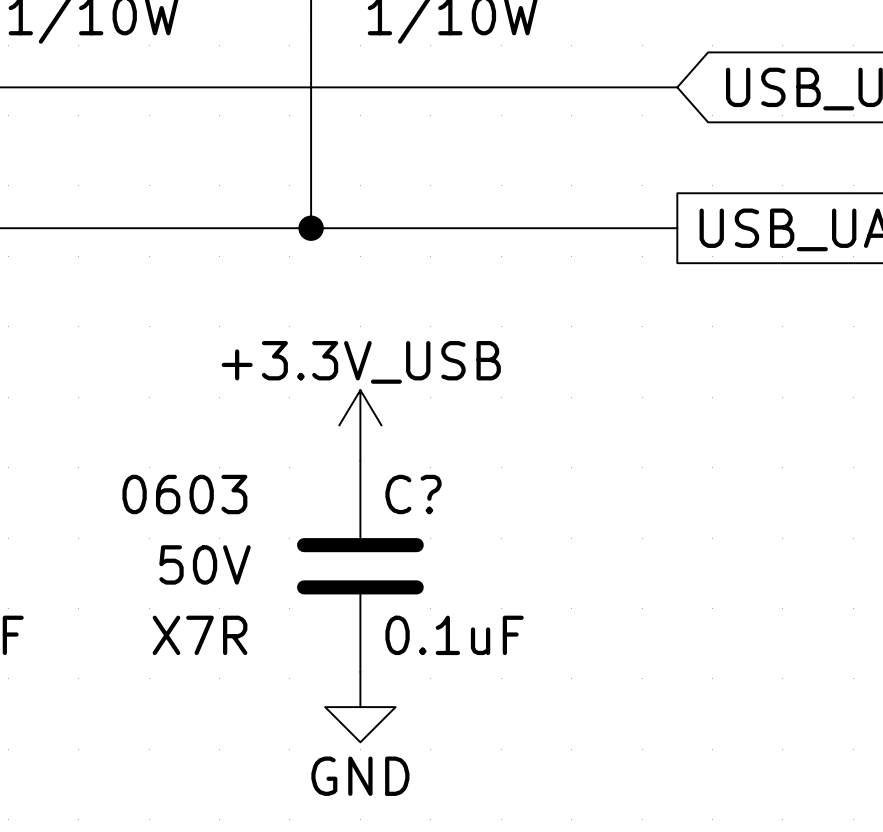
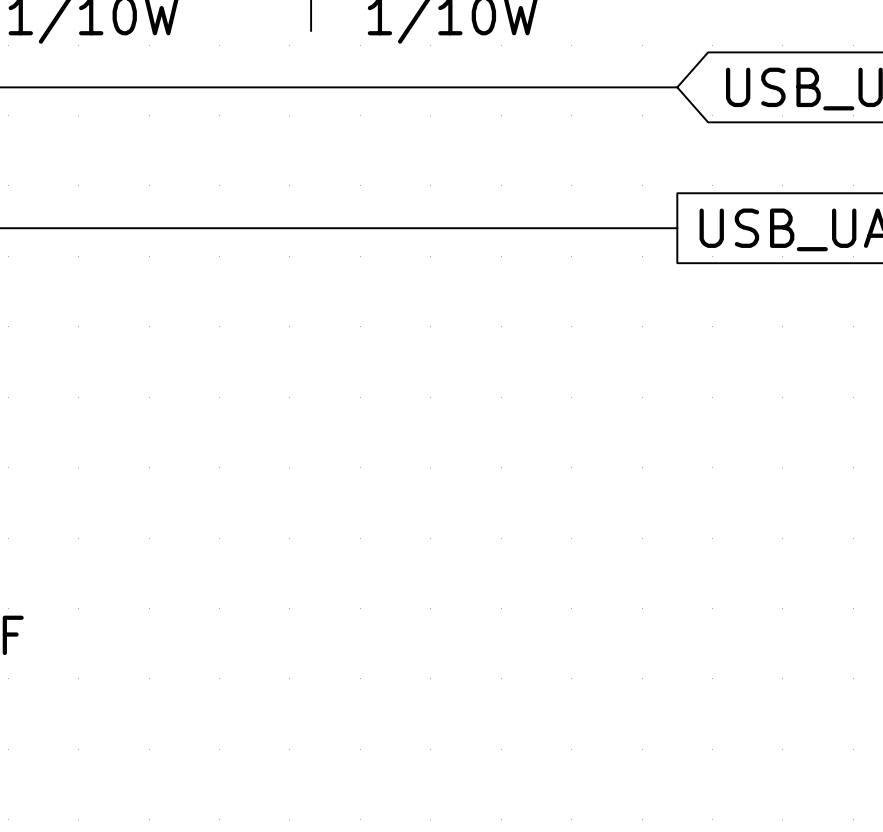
wire: (311, 31) (311, 228) -> none
junction: (311, 228) -> none
power symbol: +3.3V_USB (360, 425) -> none
C?: 0.1uF (360, 566) -> none
power symbol: GND (360, 707) -> none

